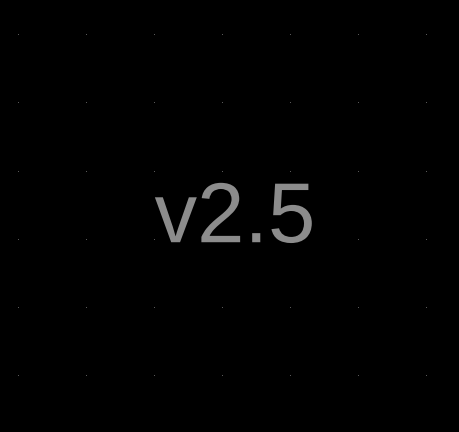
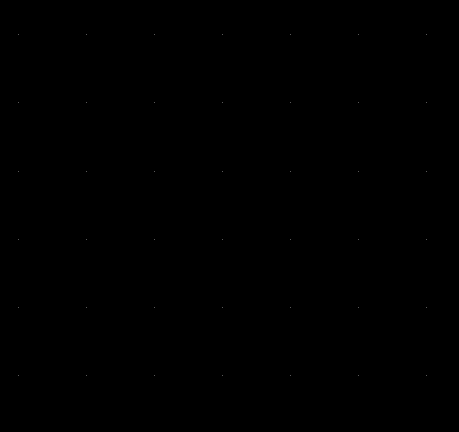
text: v2.5 (233, 212) -> none

